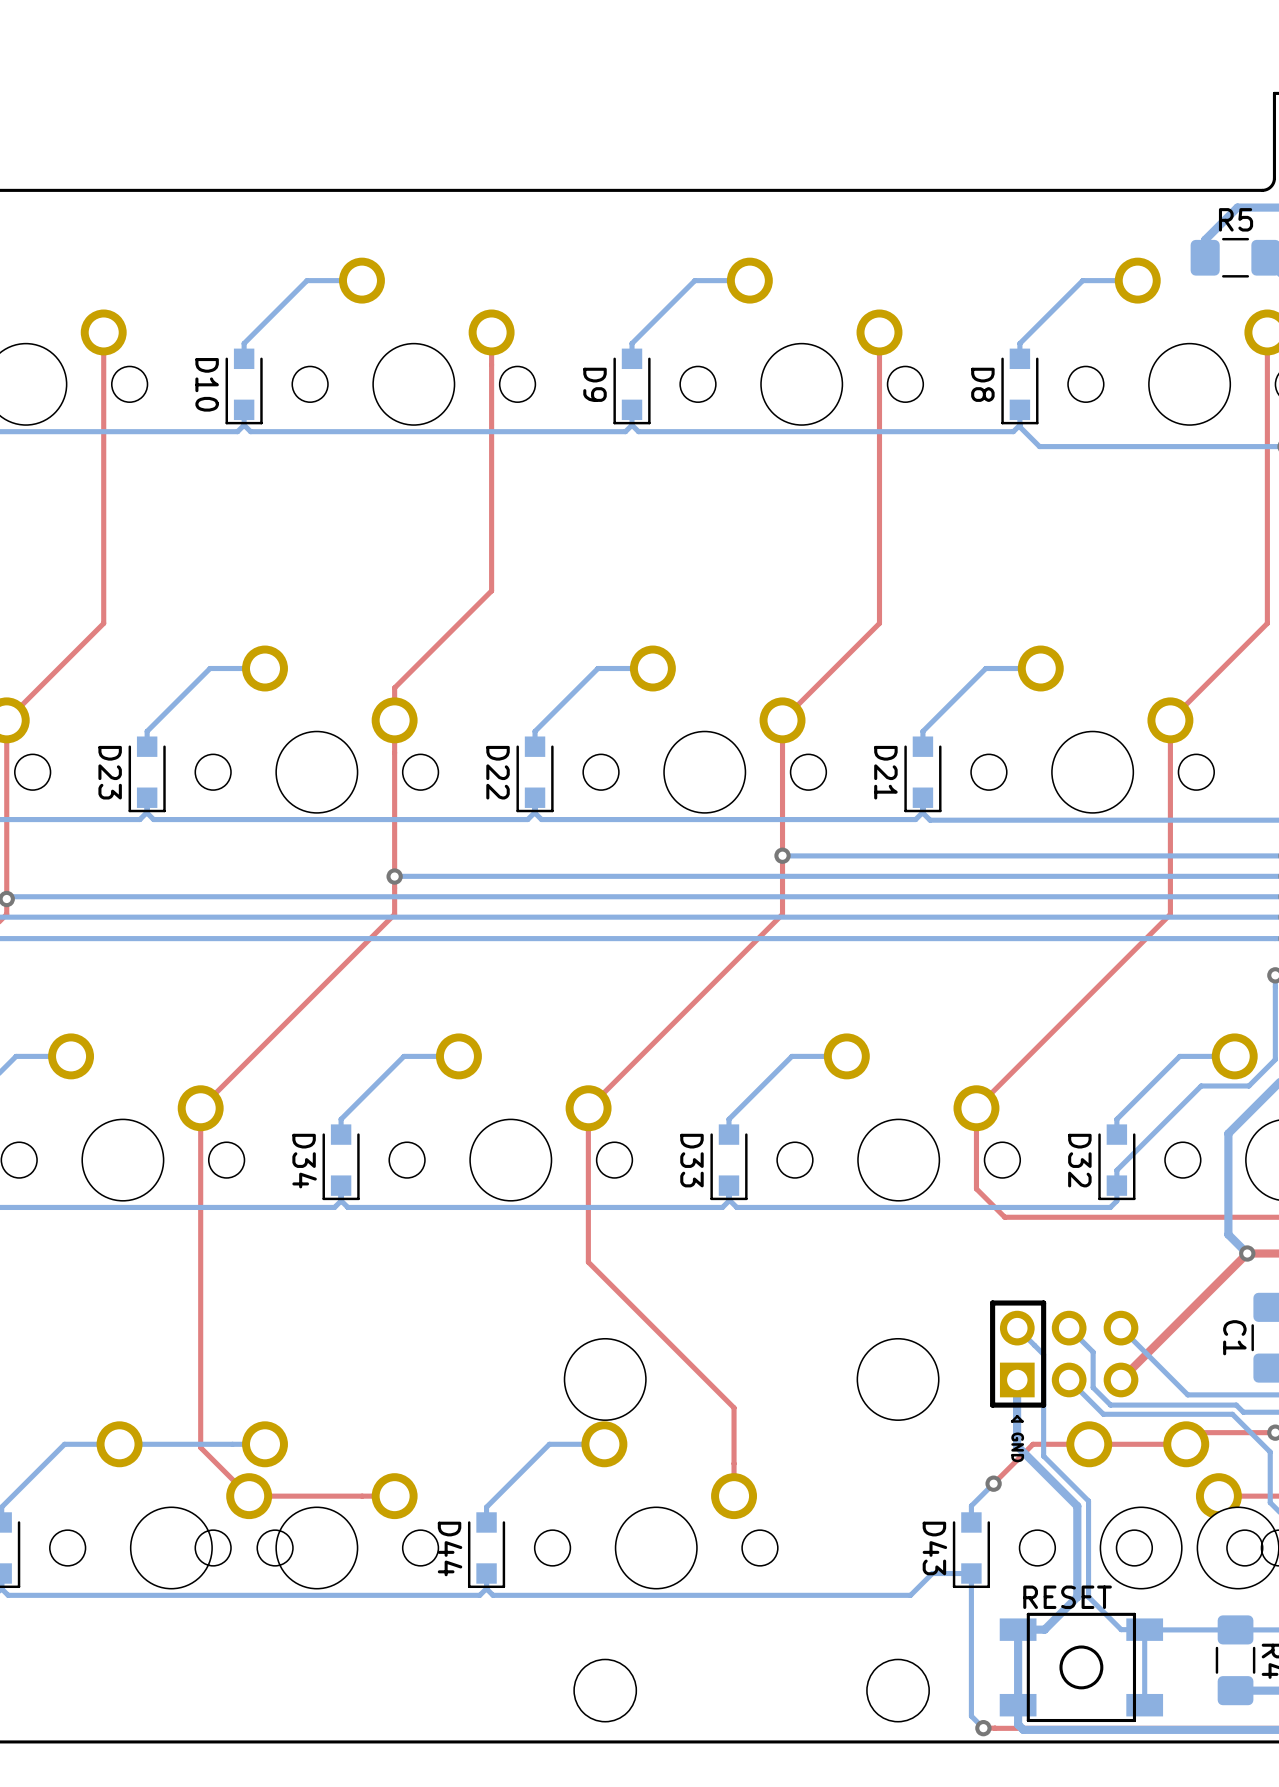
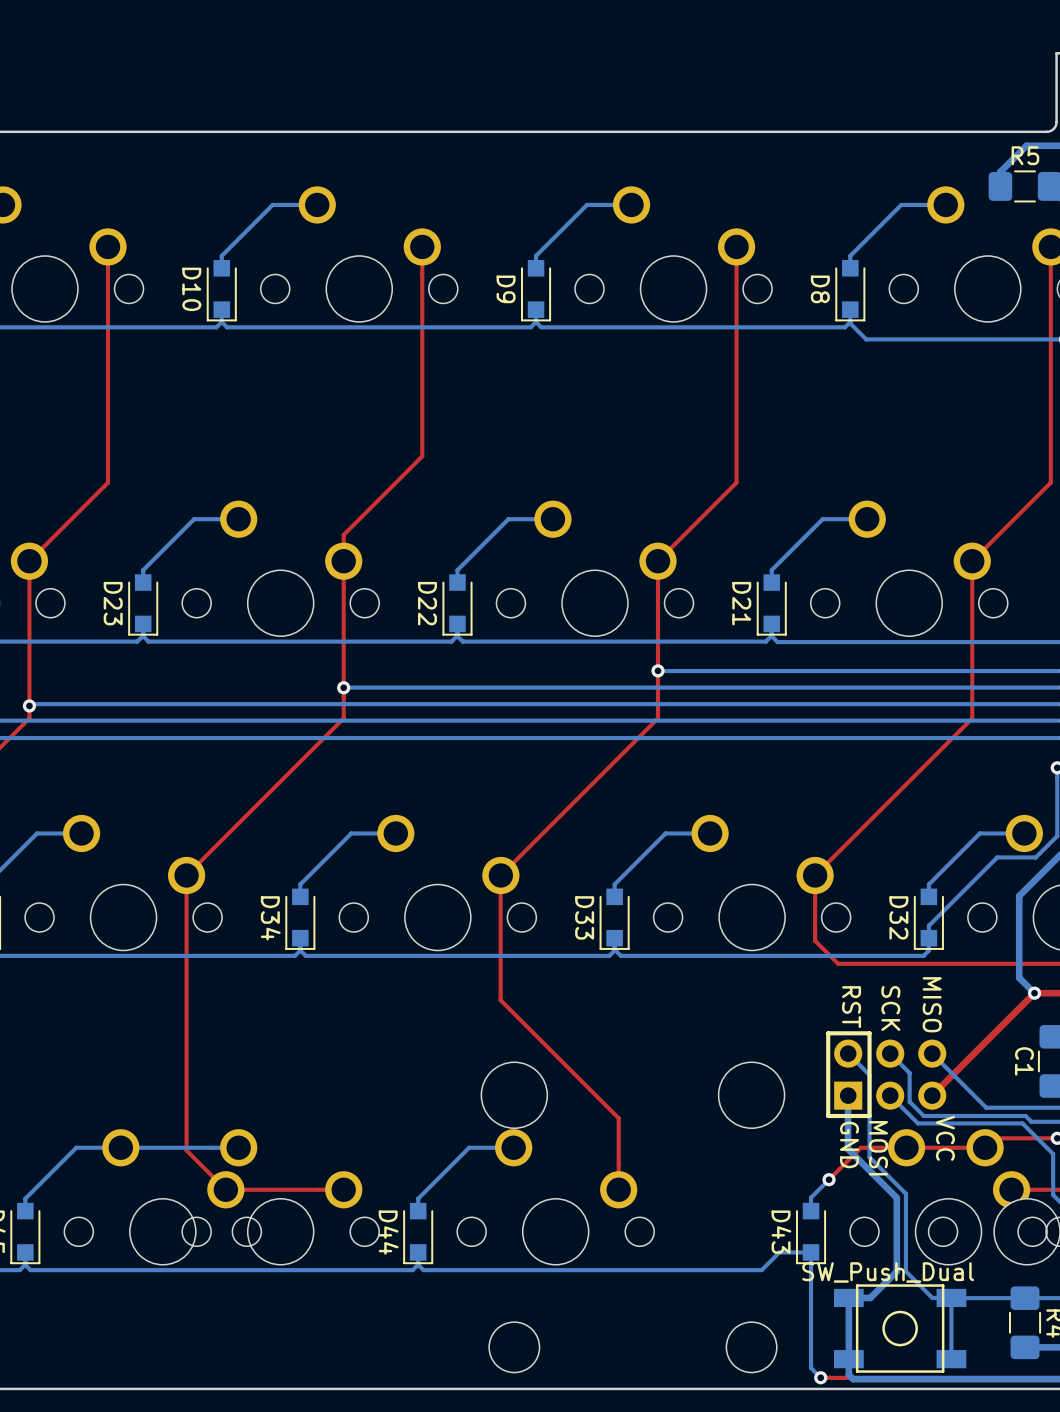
part footprint: [990, 1300, 1139, 1423] -> [826, 1031, 947, 1119]
part value: RESET (1067, 1597) -> SW_Push_Dual (888, 1272)

